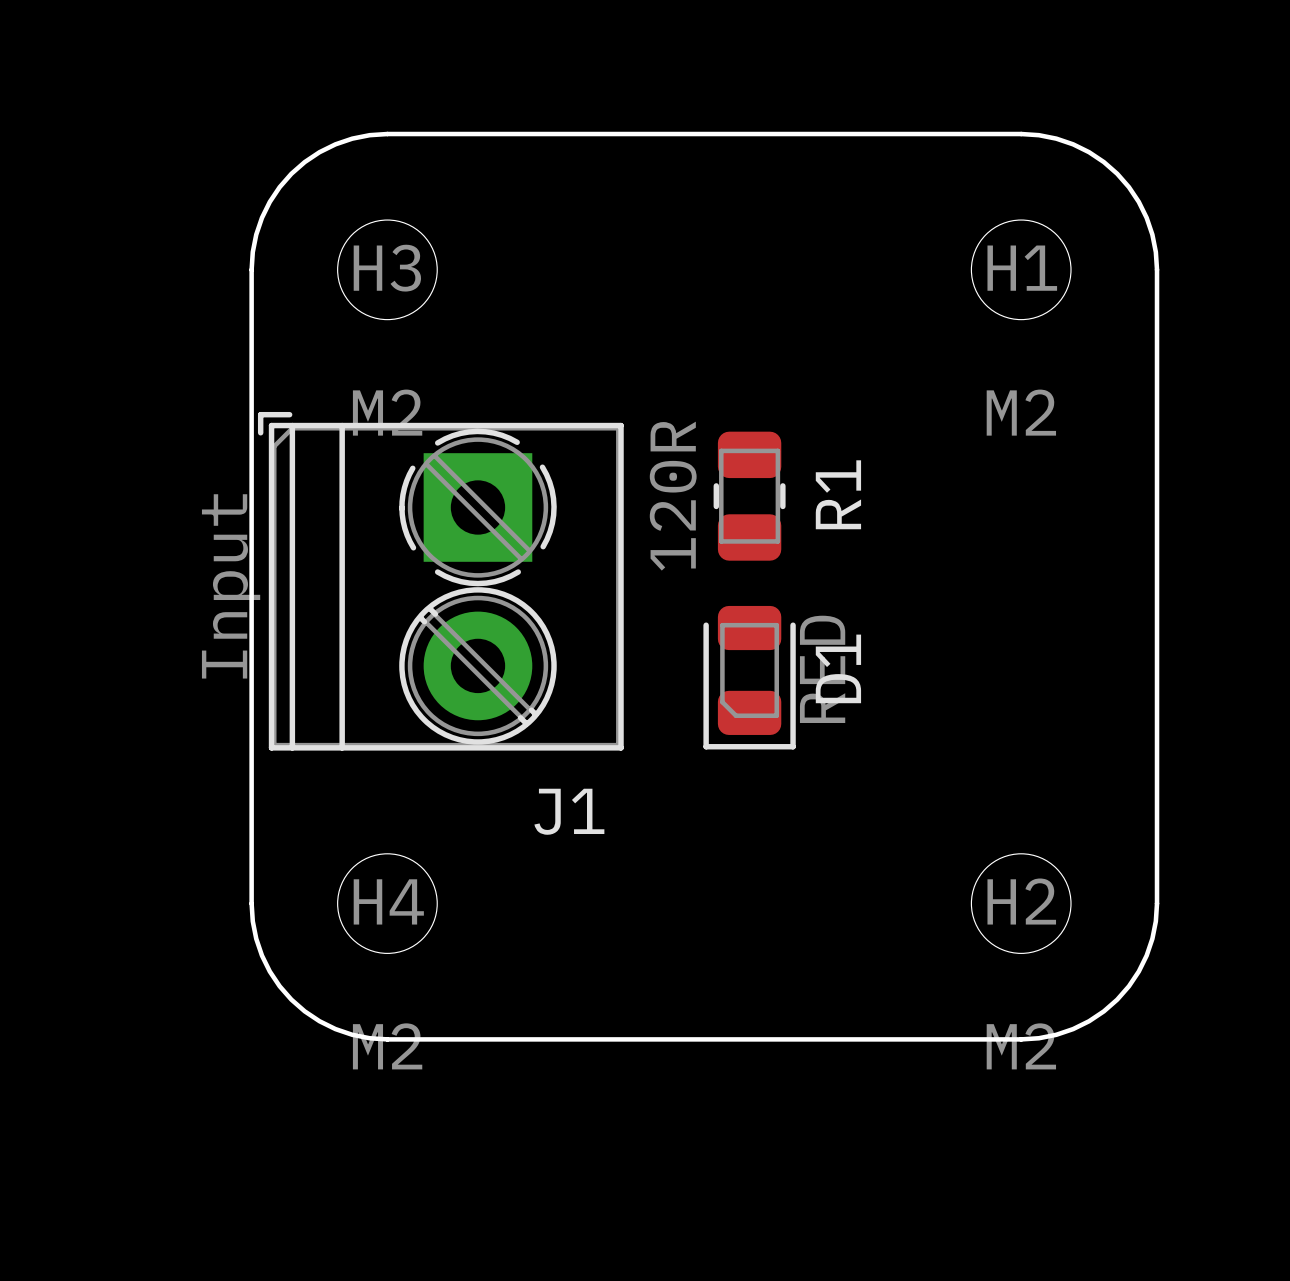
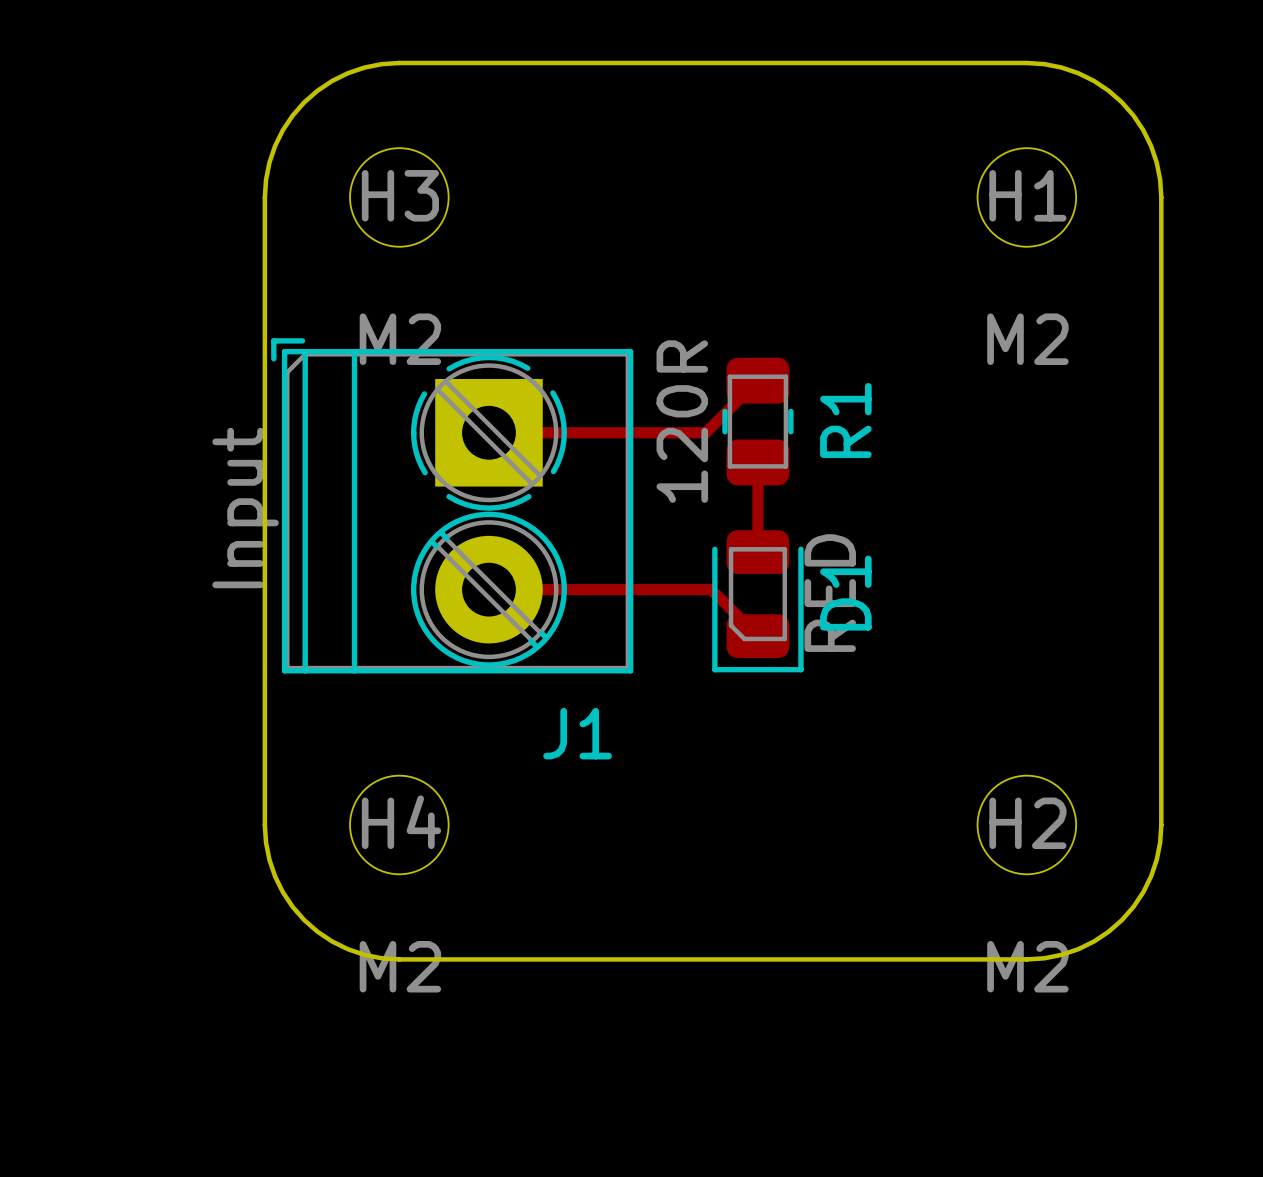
track: none -> (757, 380) (705, 432) (488, 432)
track: none -> (757, 462) (757, 552)
track: none -> (488, 589) (711, 589) (757, 636)

